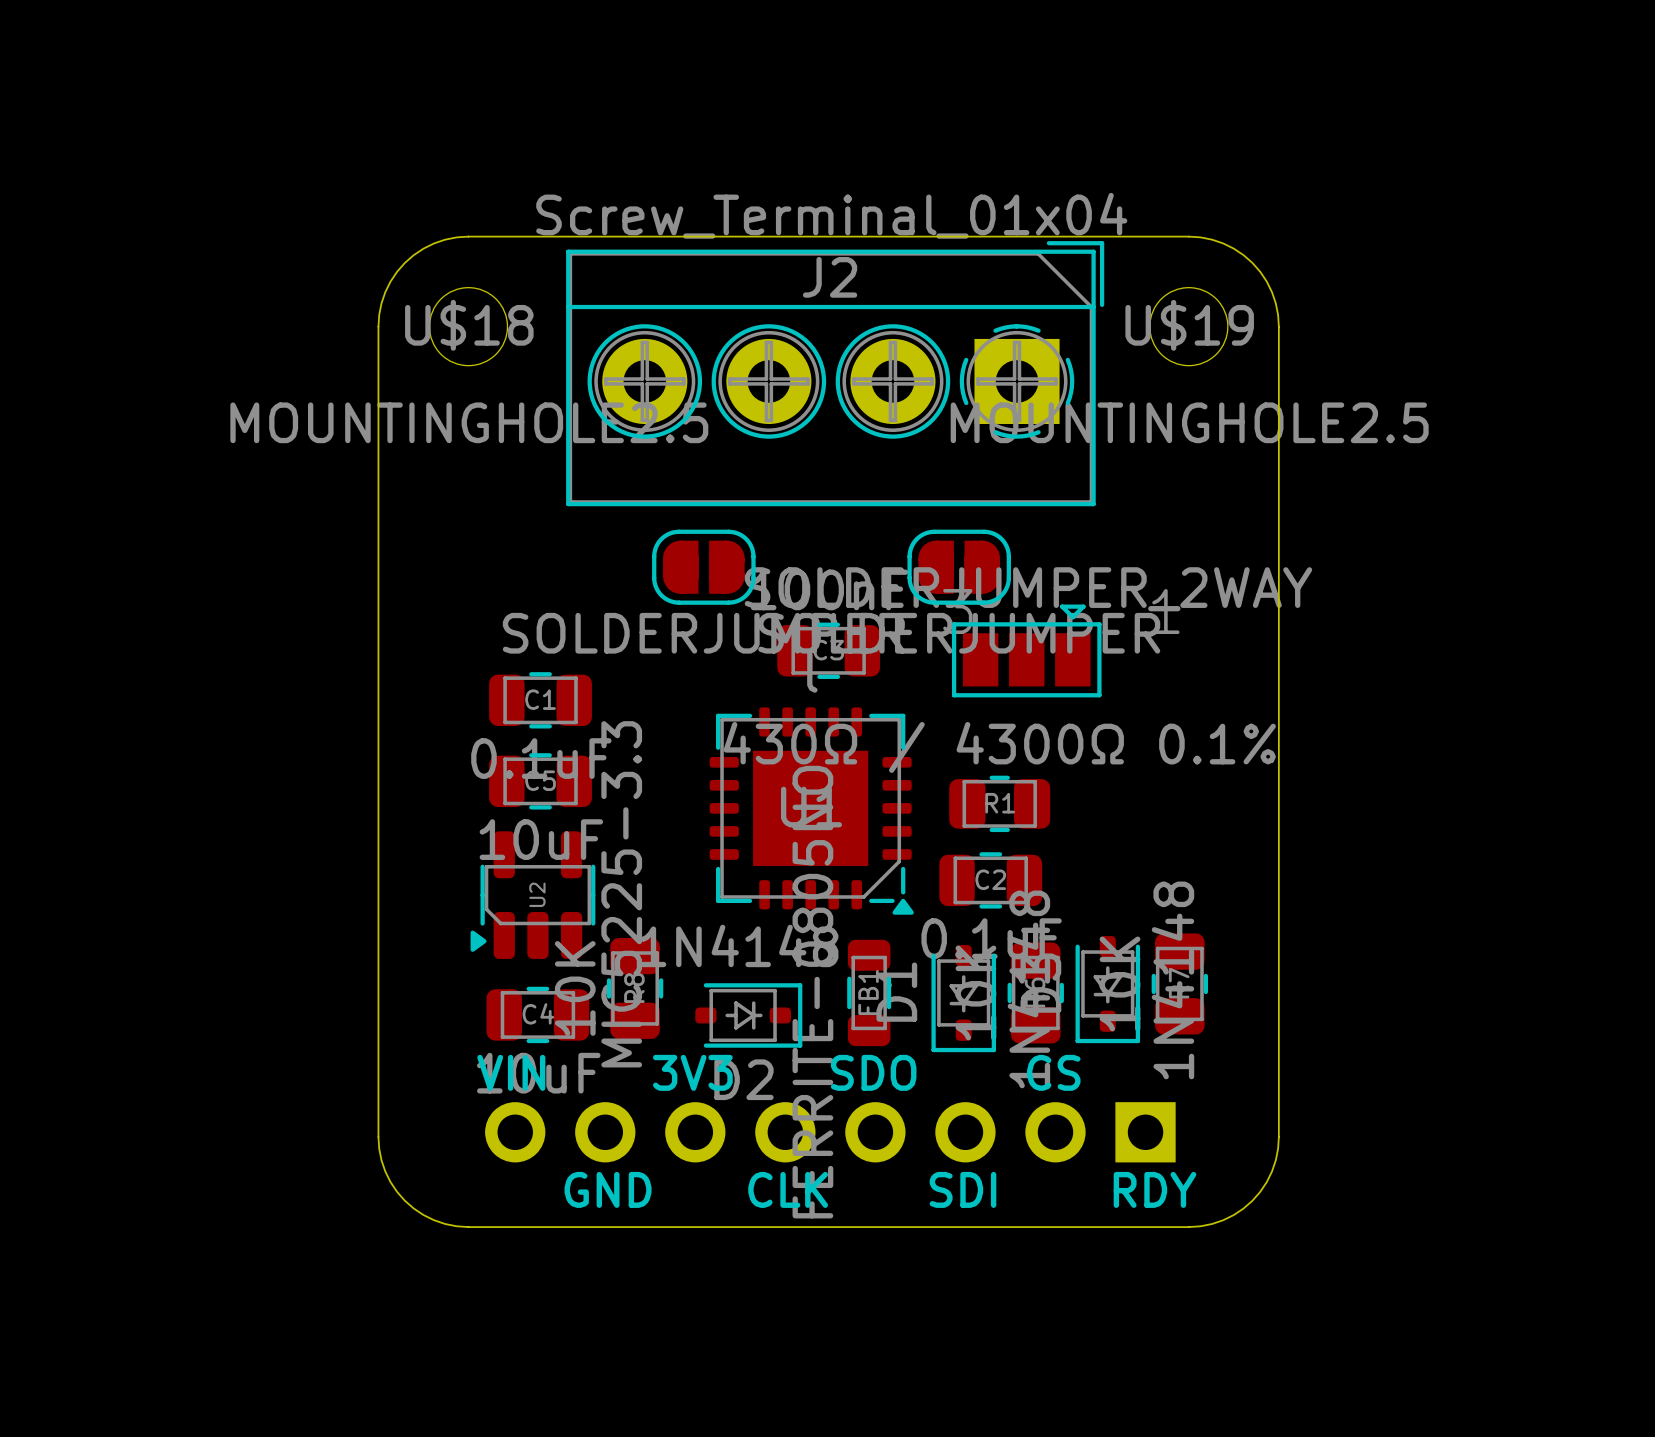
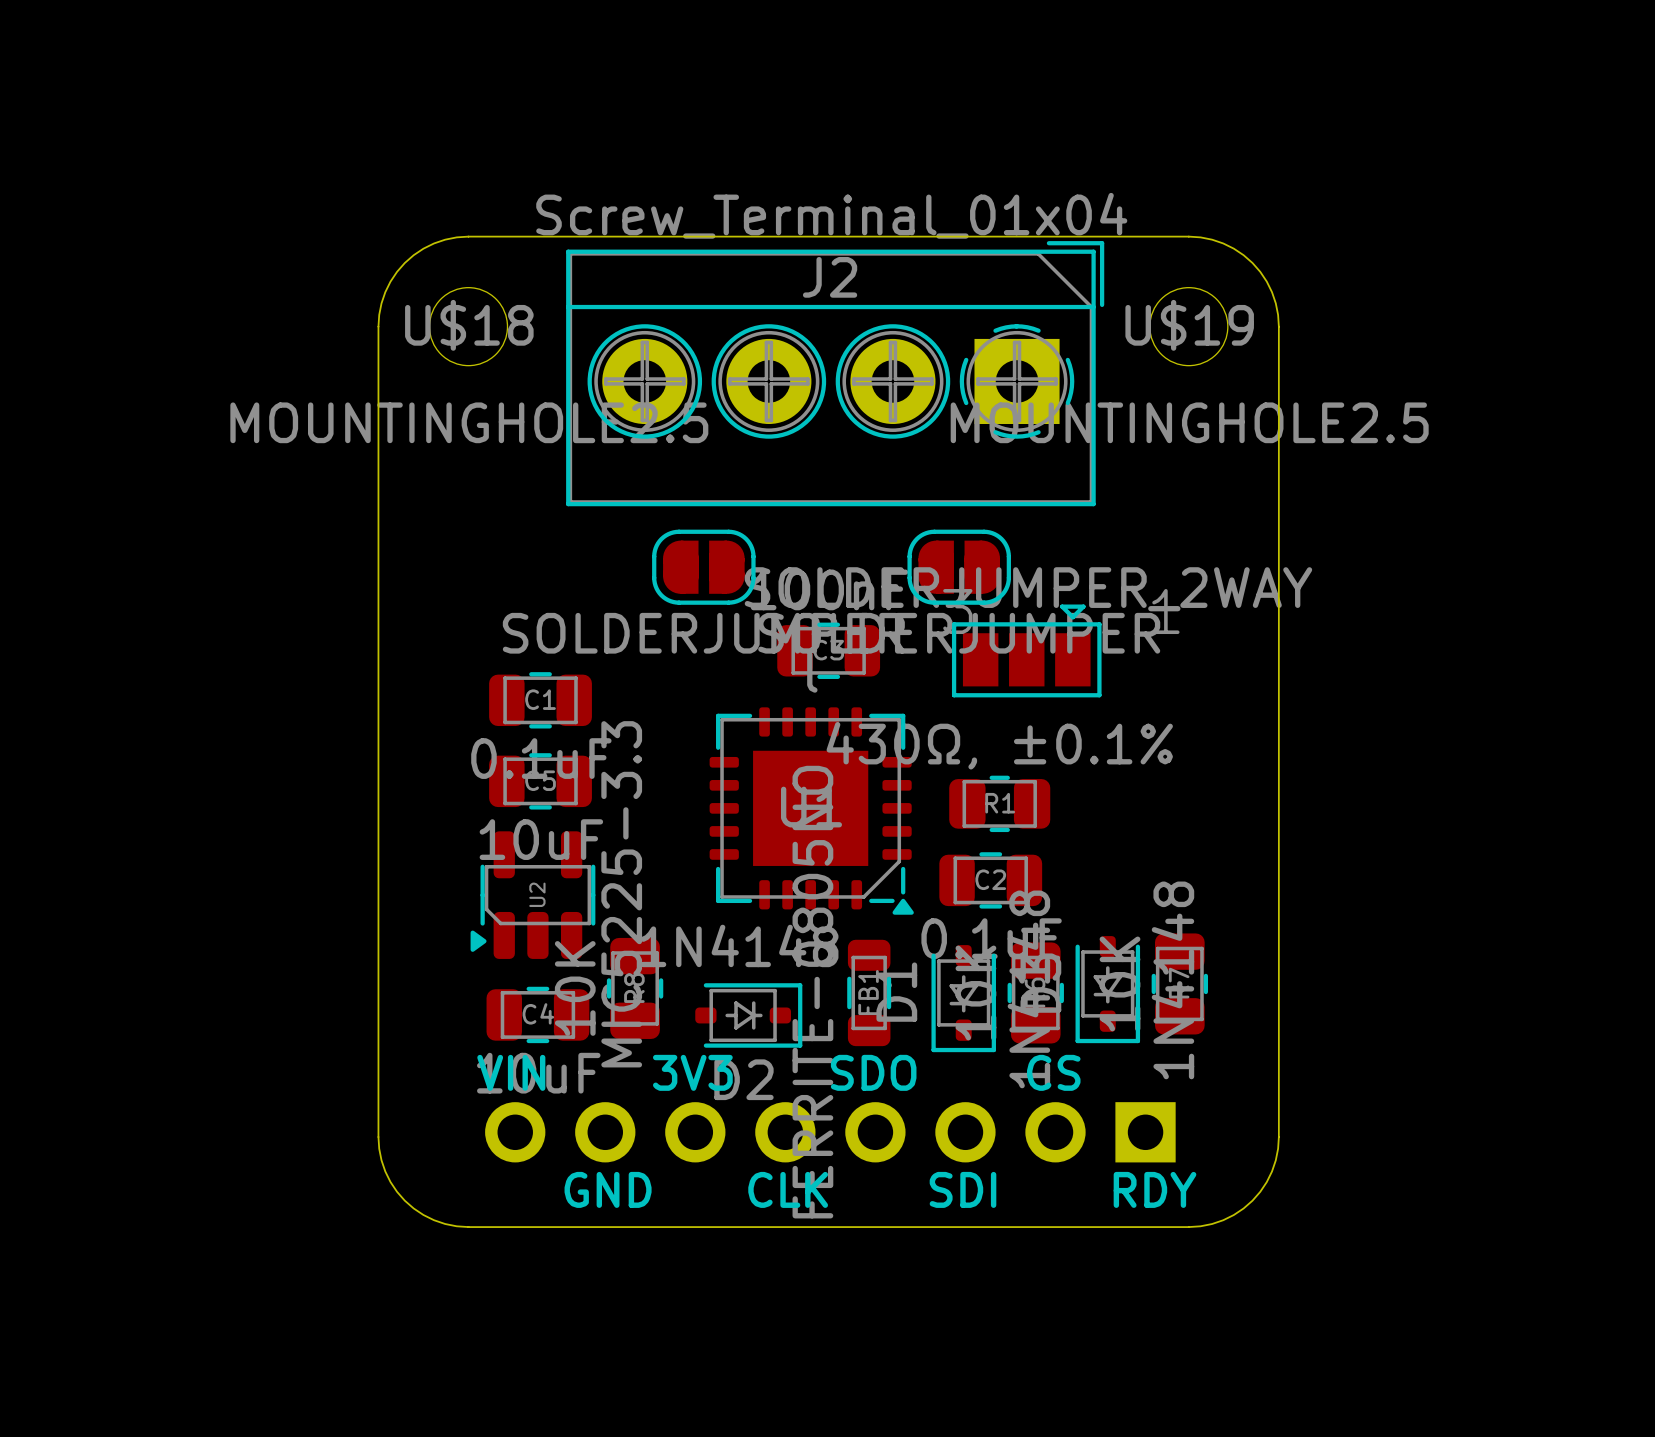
R1 value: 430Ω / 4300Ω 0.1% (999, 747) -> 430Ω, ±0.1% (999, 745)

